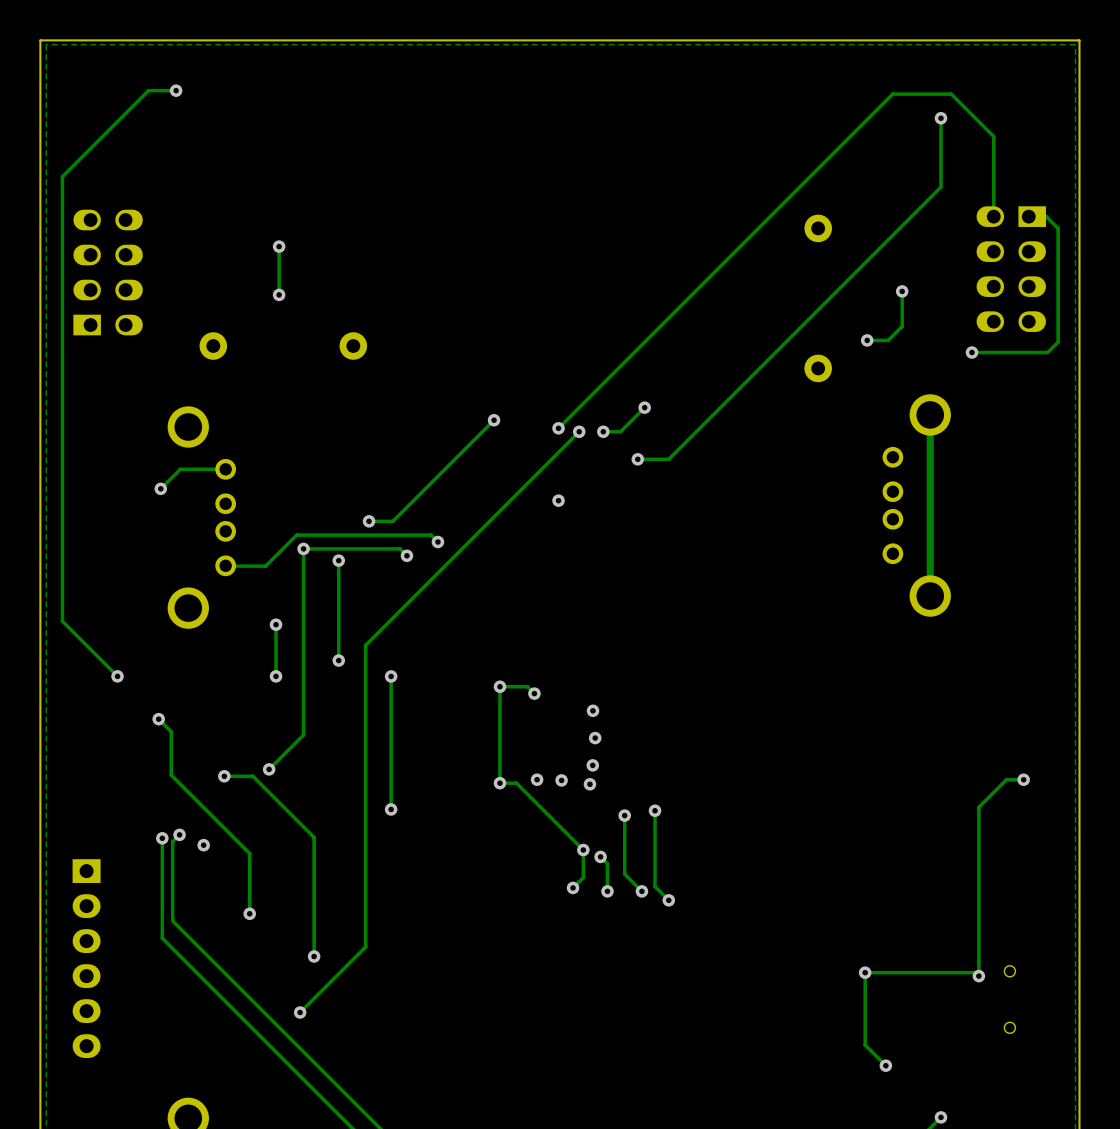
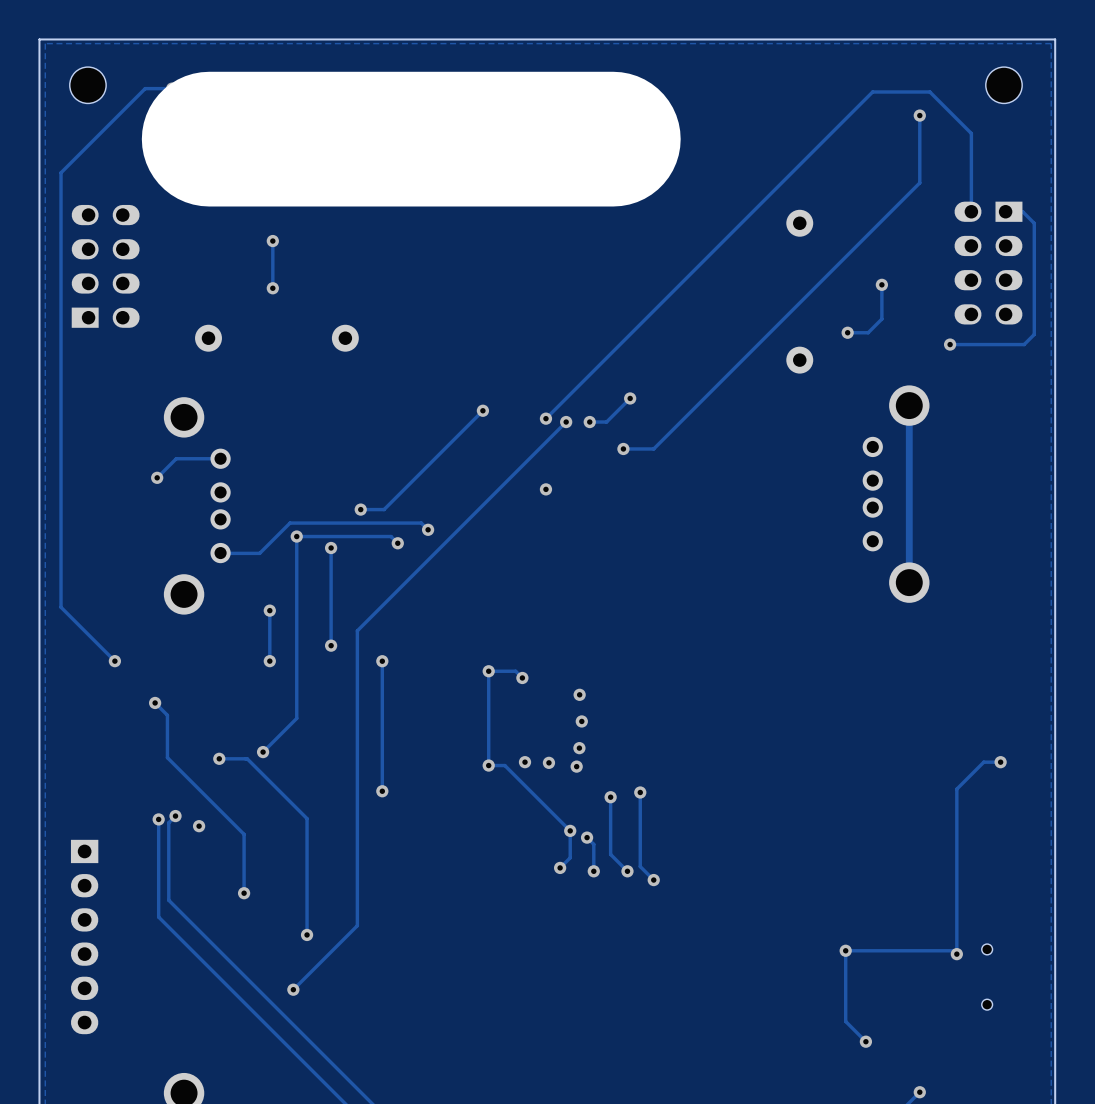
part: none -> (87, 85)
part: none -> (1003, 85)
line: none -> (613, 139) (209, 139)

